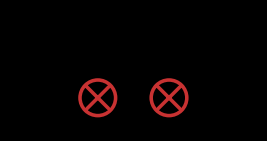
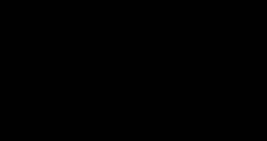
part: (97, 97) -> none
part: (168, 97) -> none

